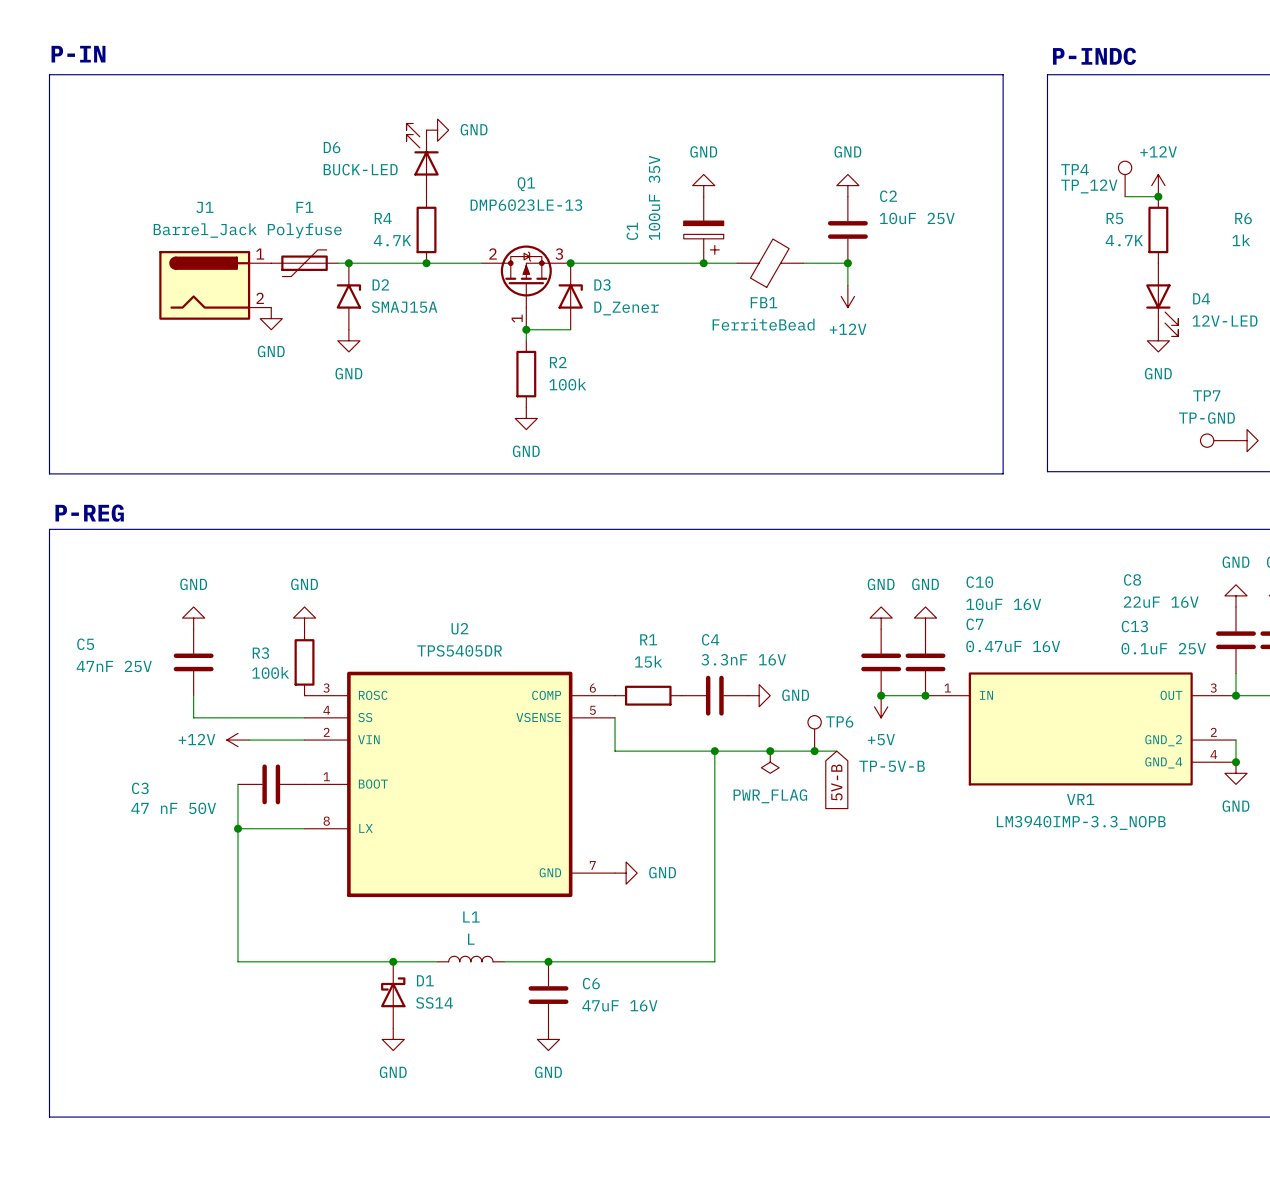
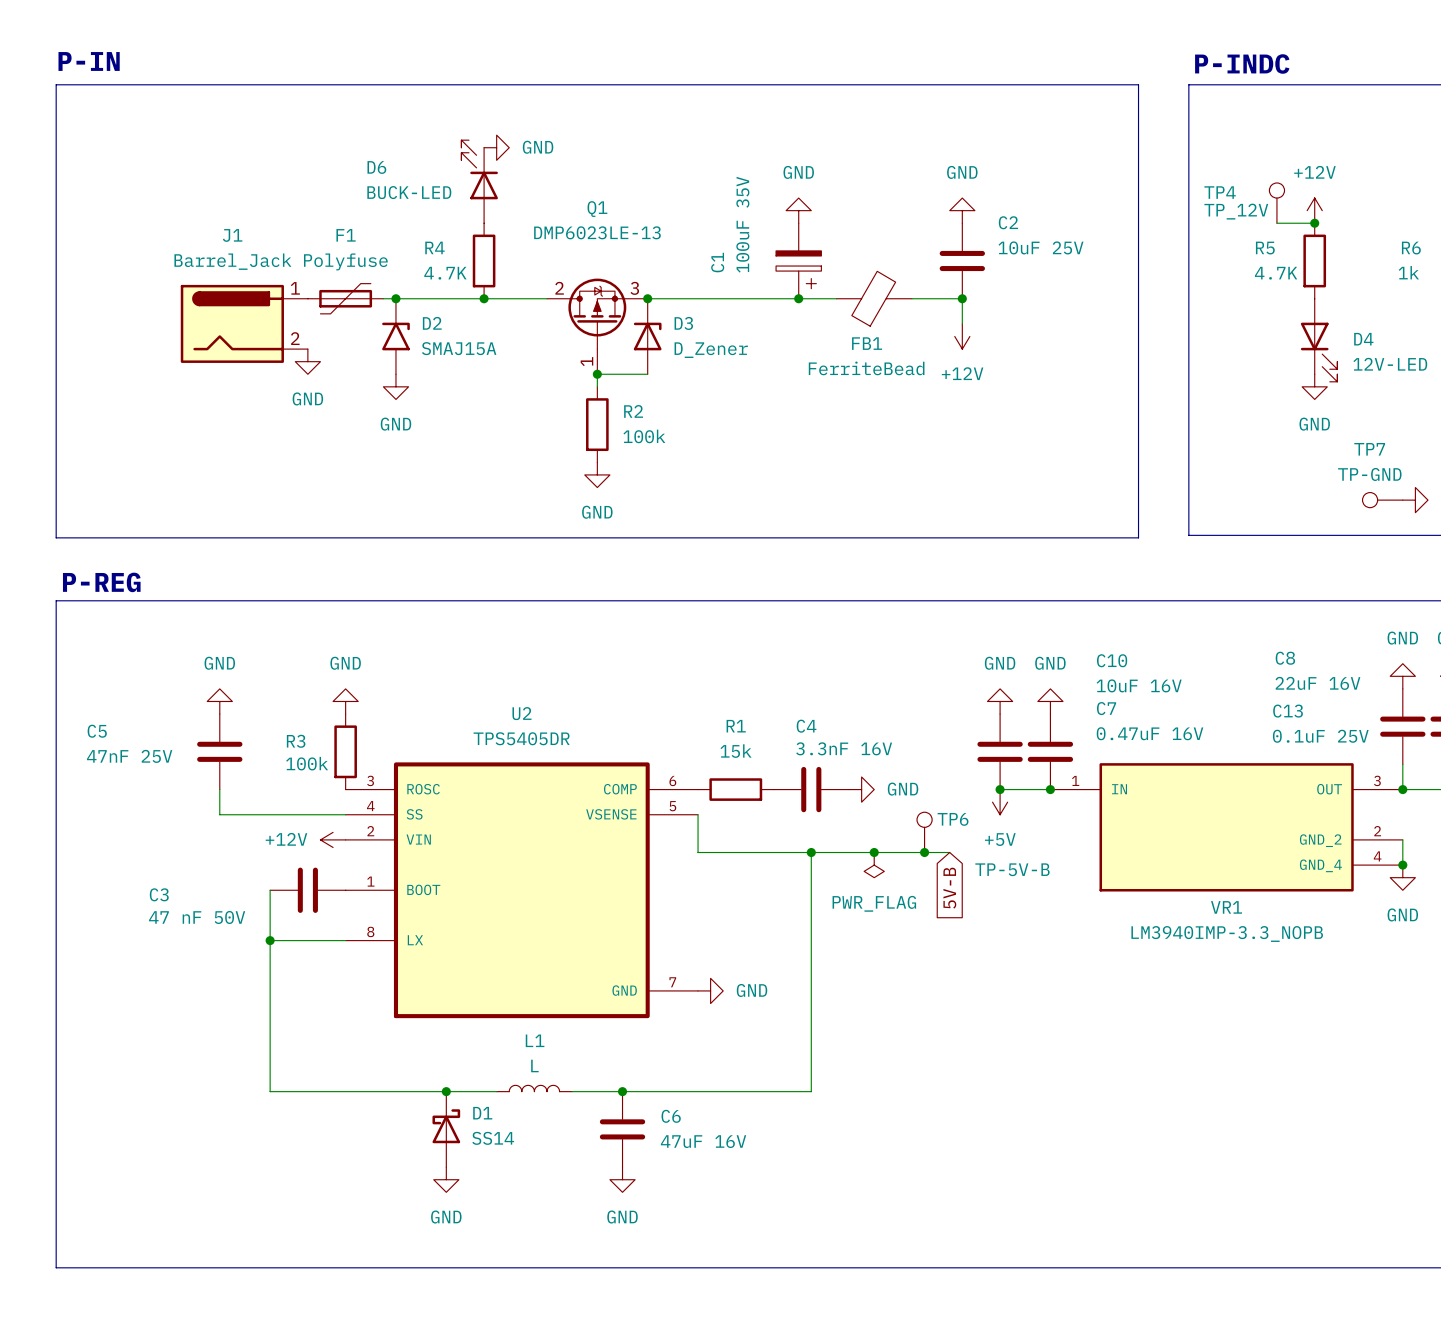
power symbol position: +12V (238, 740) -> +12V (333, 839)
wire: (249, 740) (304, 740) -> none

